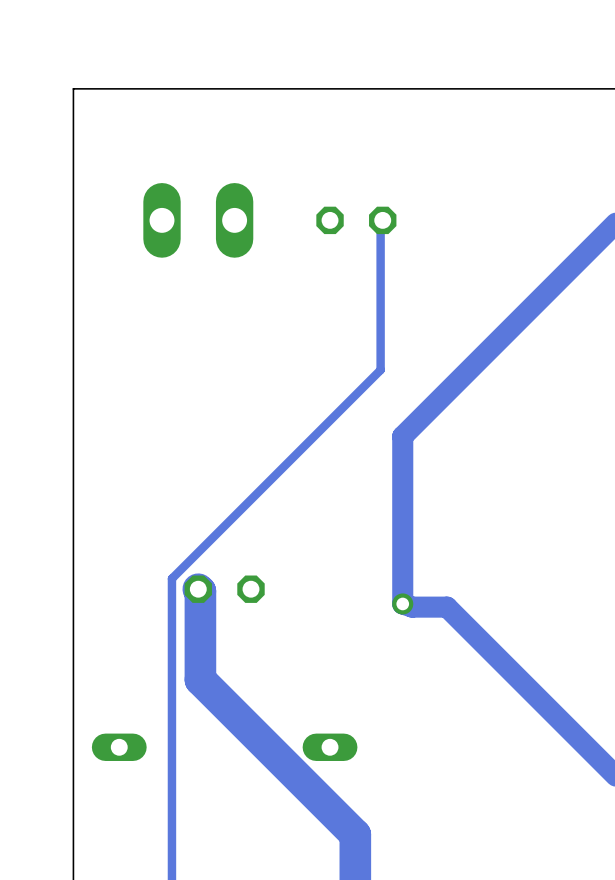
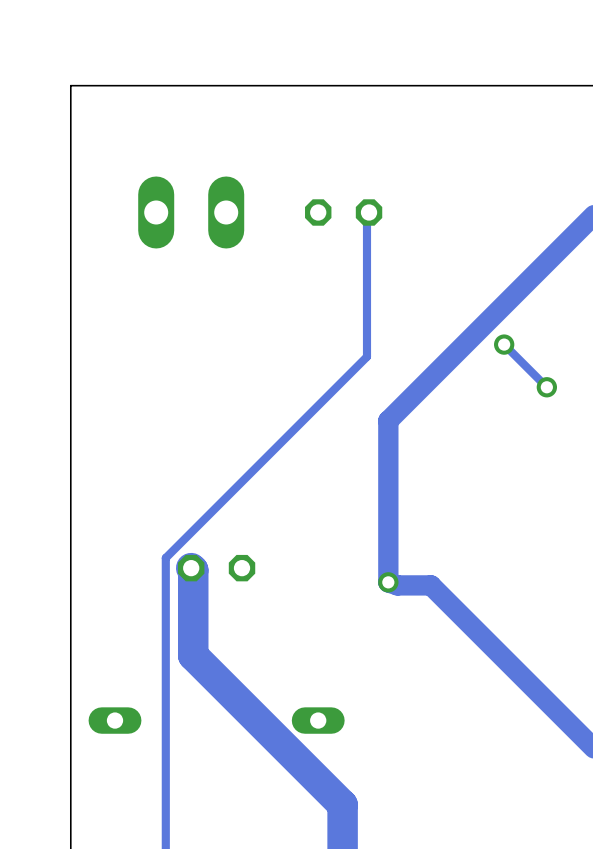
track: none -> (504, 344) (546, 387)
via: none -> (504, 344)
via: none -> (546, 387)

